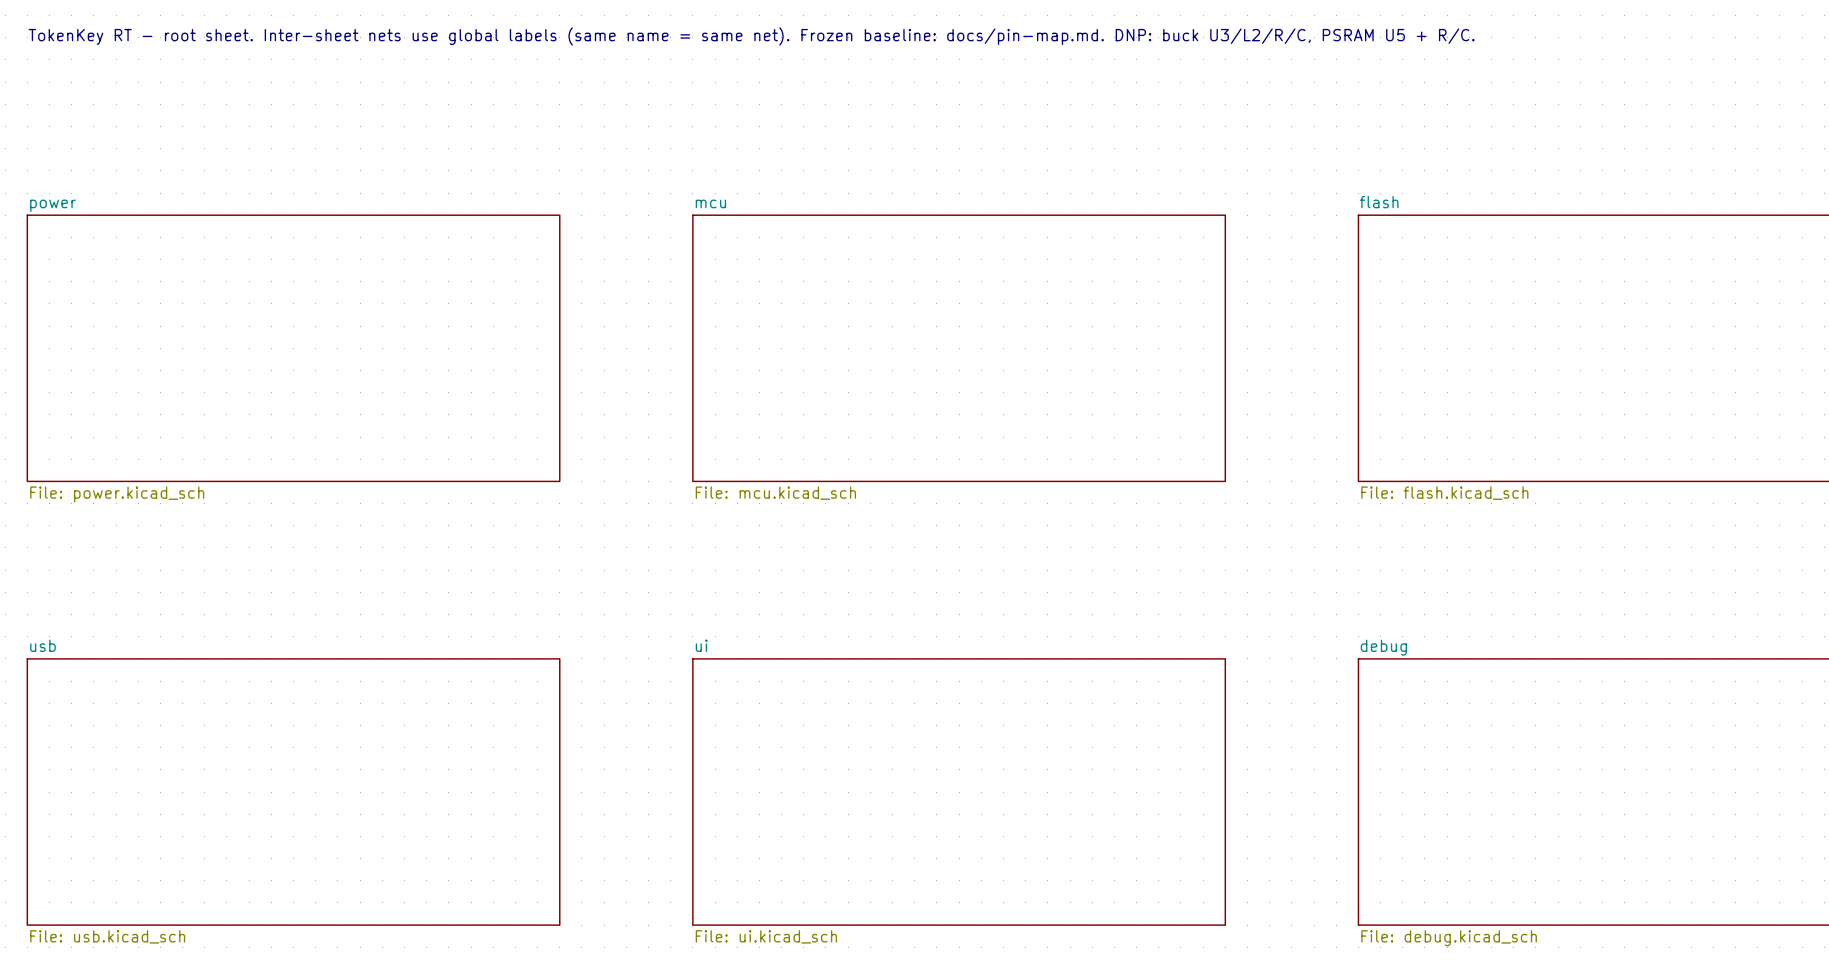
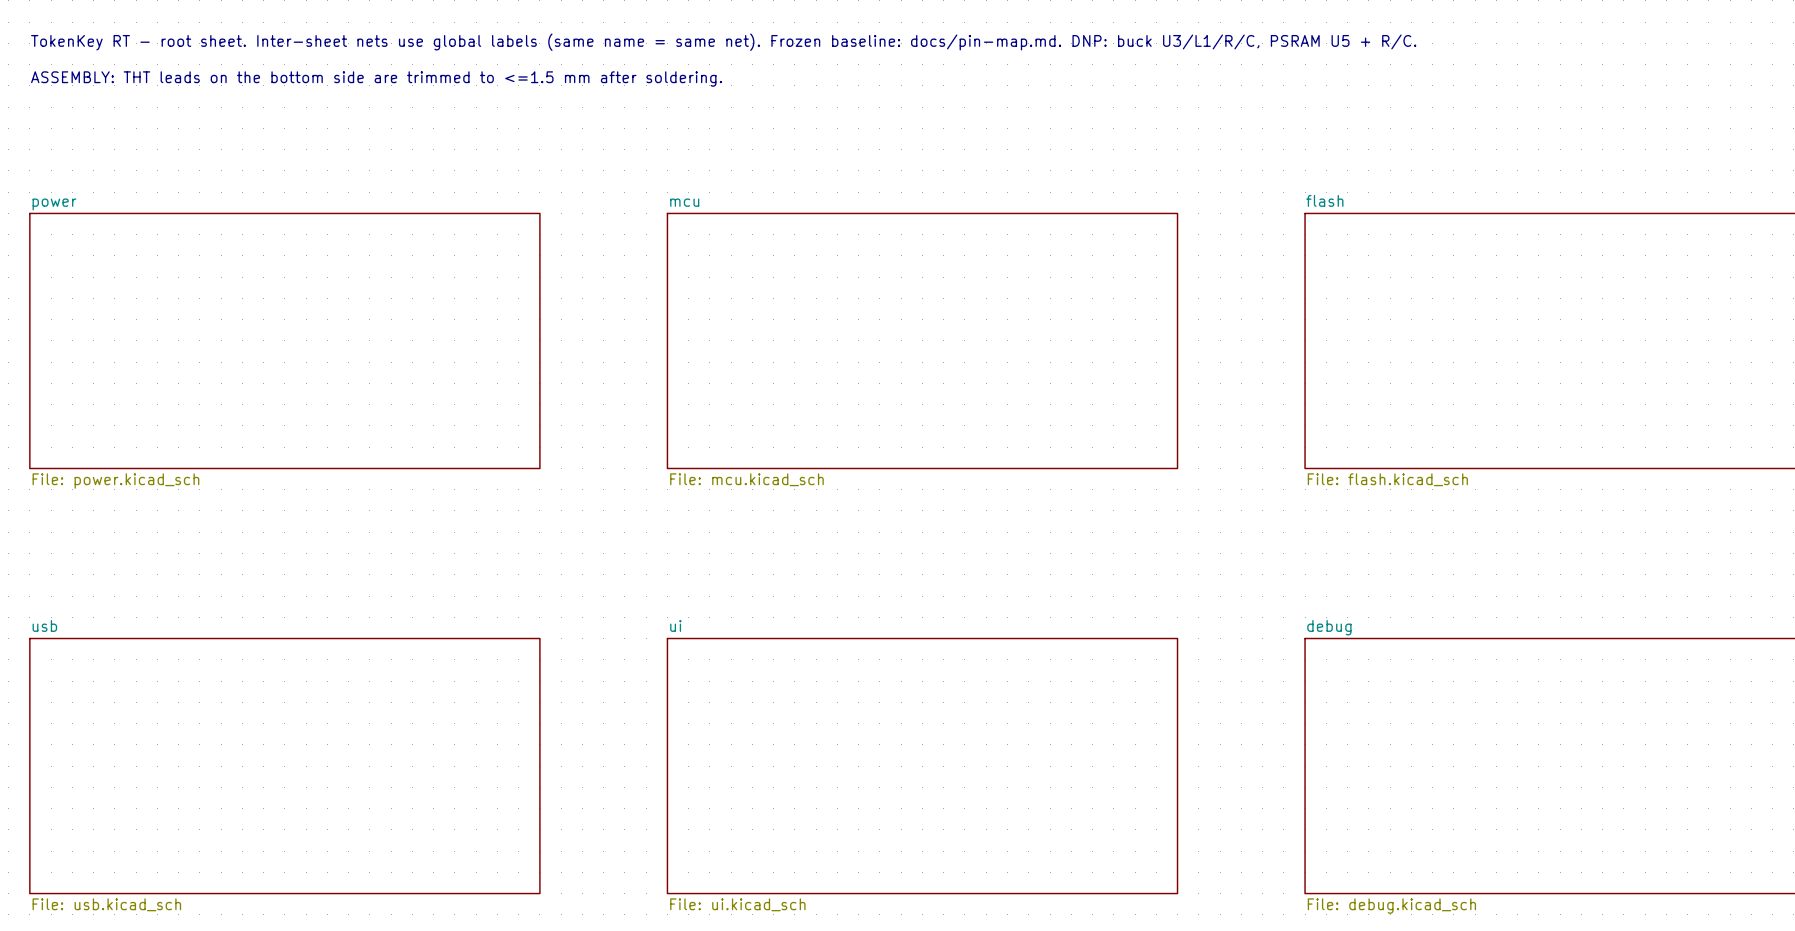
text: TokenKey RT - root sheet. Inter-sheet nets use global labels (same name = same net). Frozen baseline: docs/pin-map.md. DNP: buck U3/L2/R/C, PSRAM U5 + R/C. (751, 36) -> TokenKey RT - root sheet. Inter-sheet nets use global labels (same name = same net). Frozen baseline: docs/pin-map.md. DNP: buck U3/L1/R/C, PSRAM U5 + R/C. (723, 42)
text: none -> ASSEMBLY: THT leads on the bottom side are trimmed to <=1.5 mm after soldering. (376, 79)

